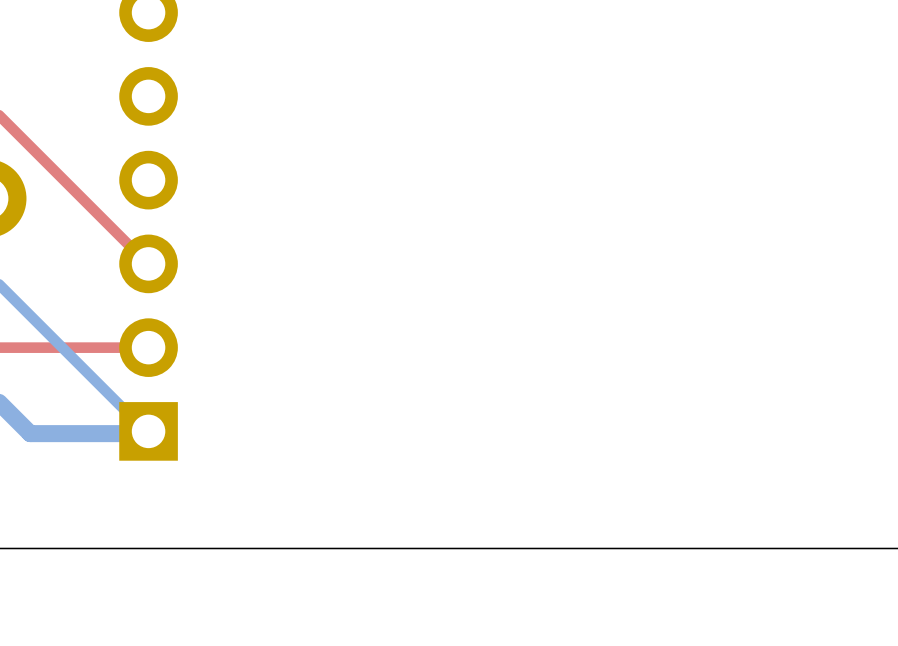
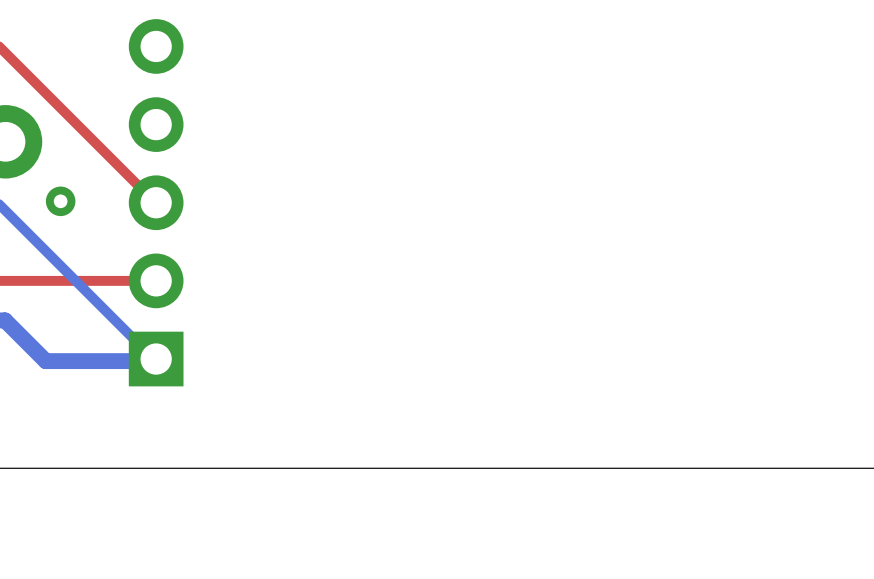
via: none -> (60, 201)

